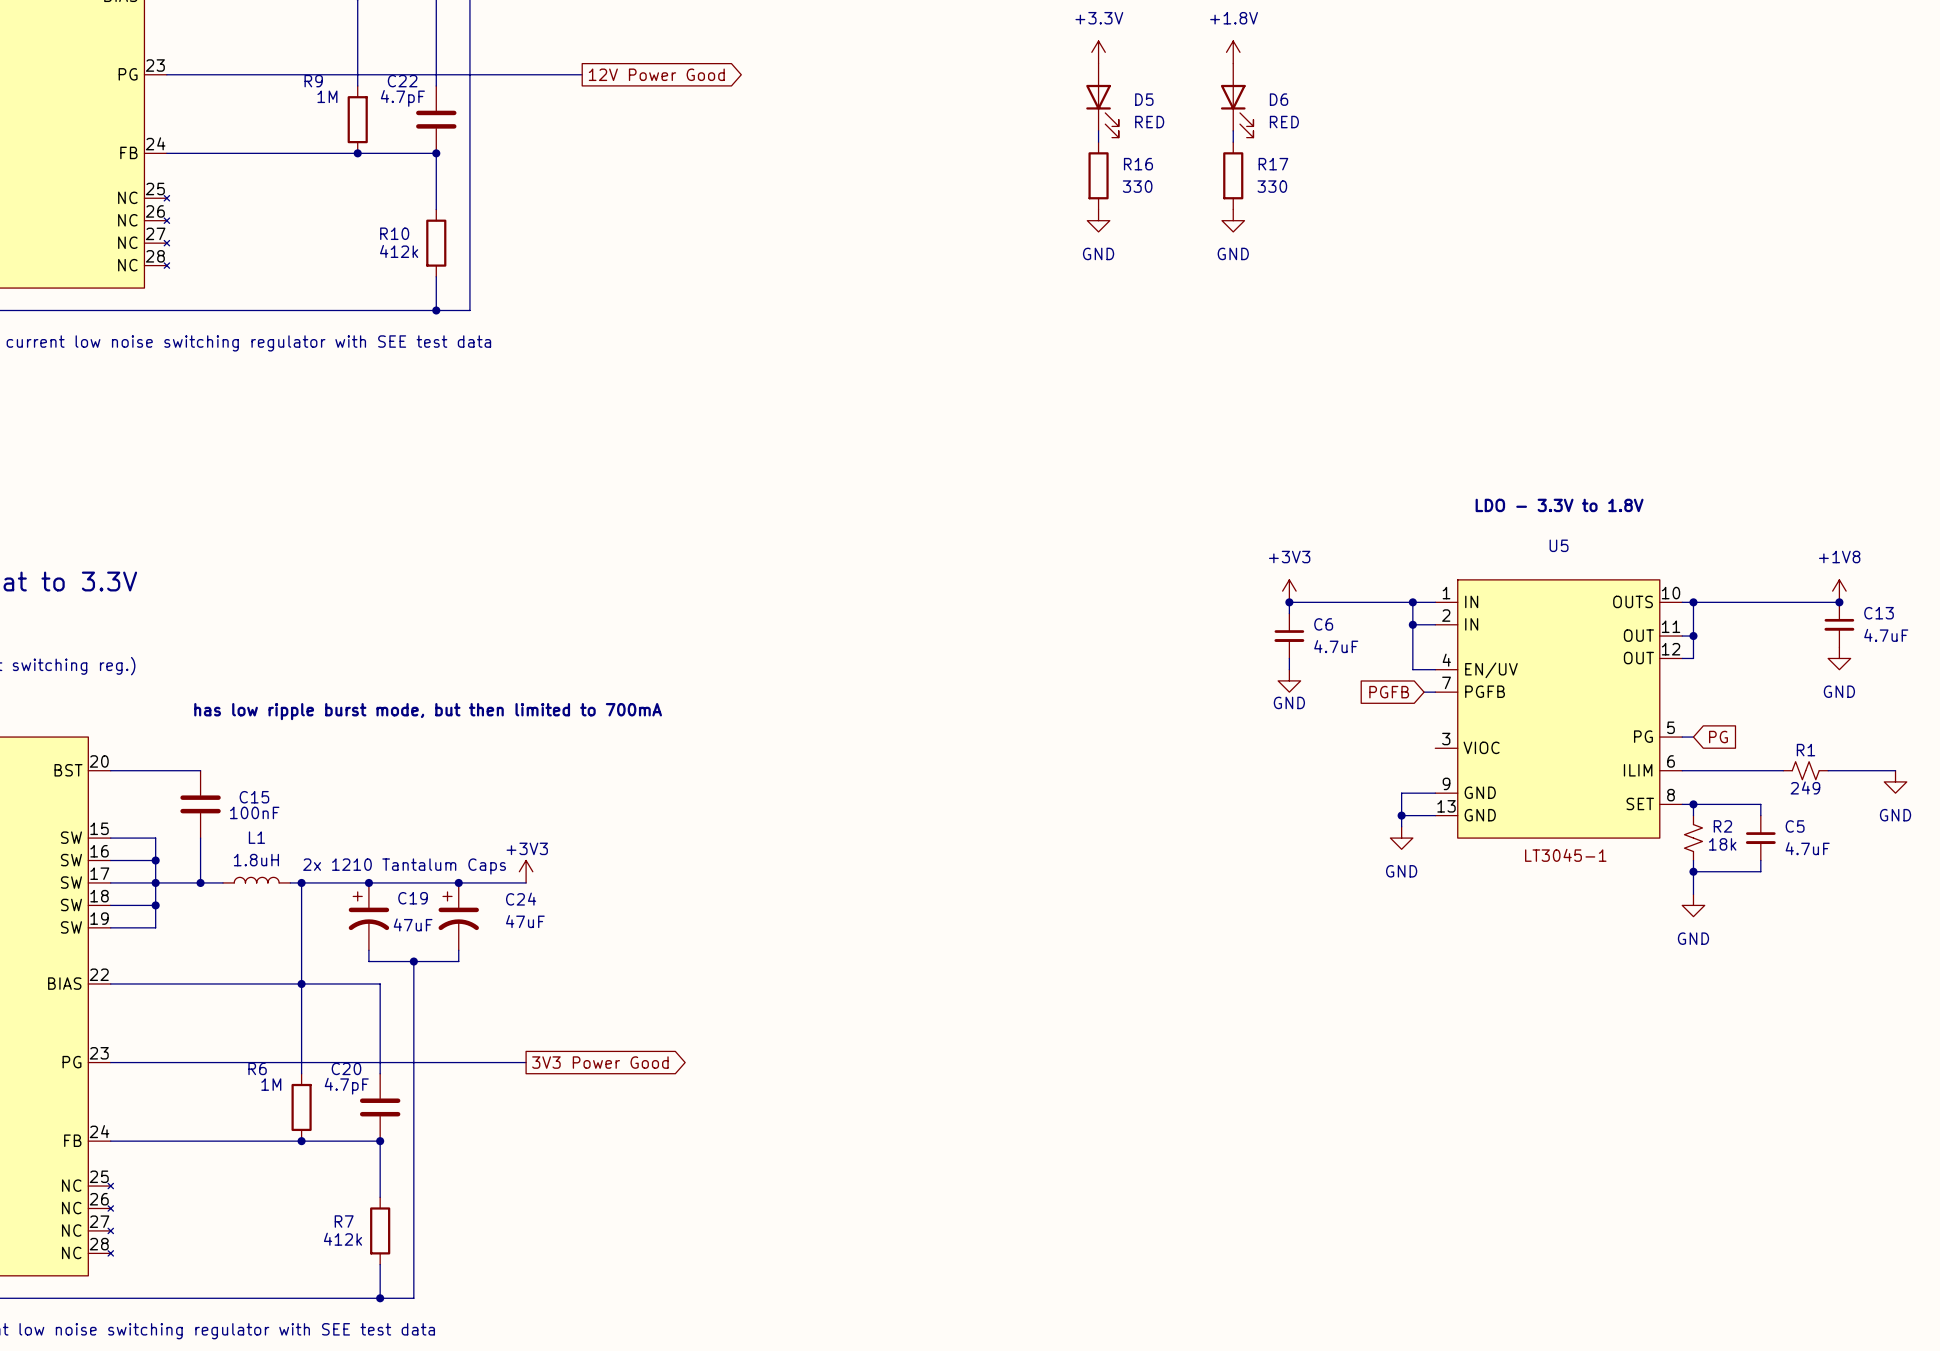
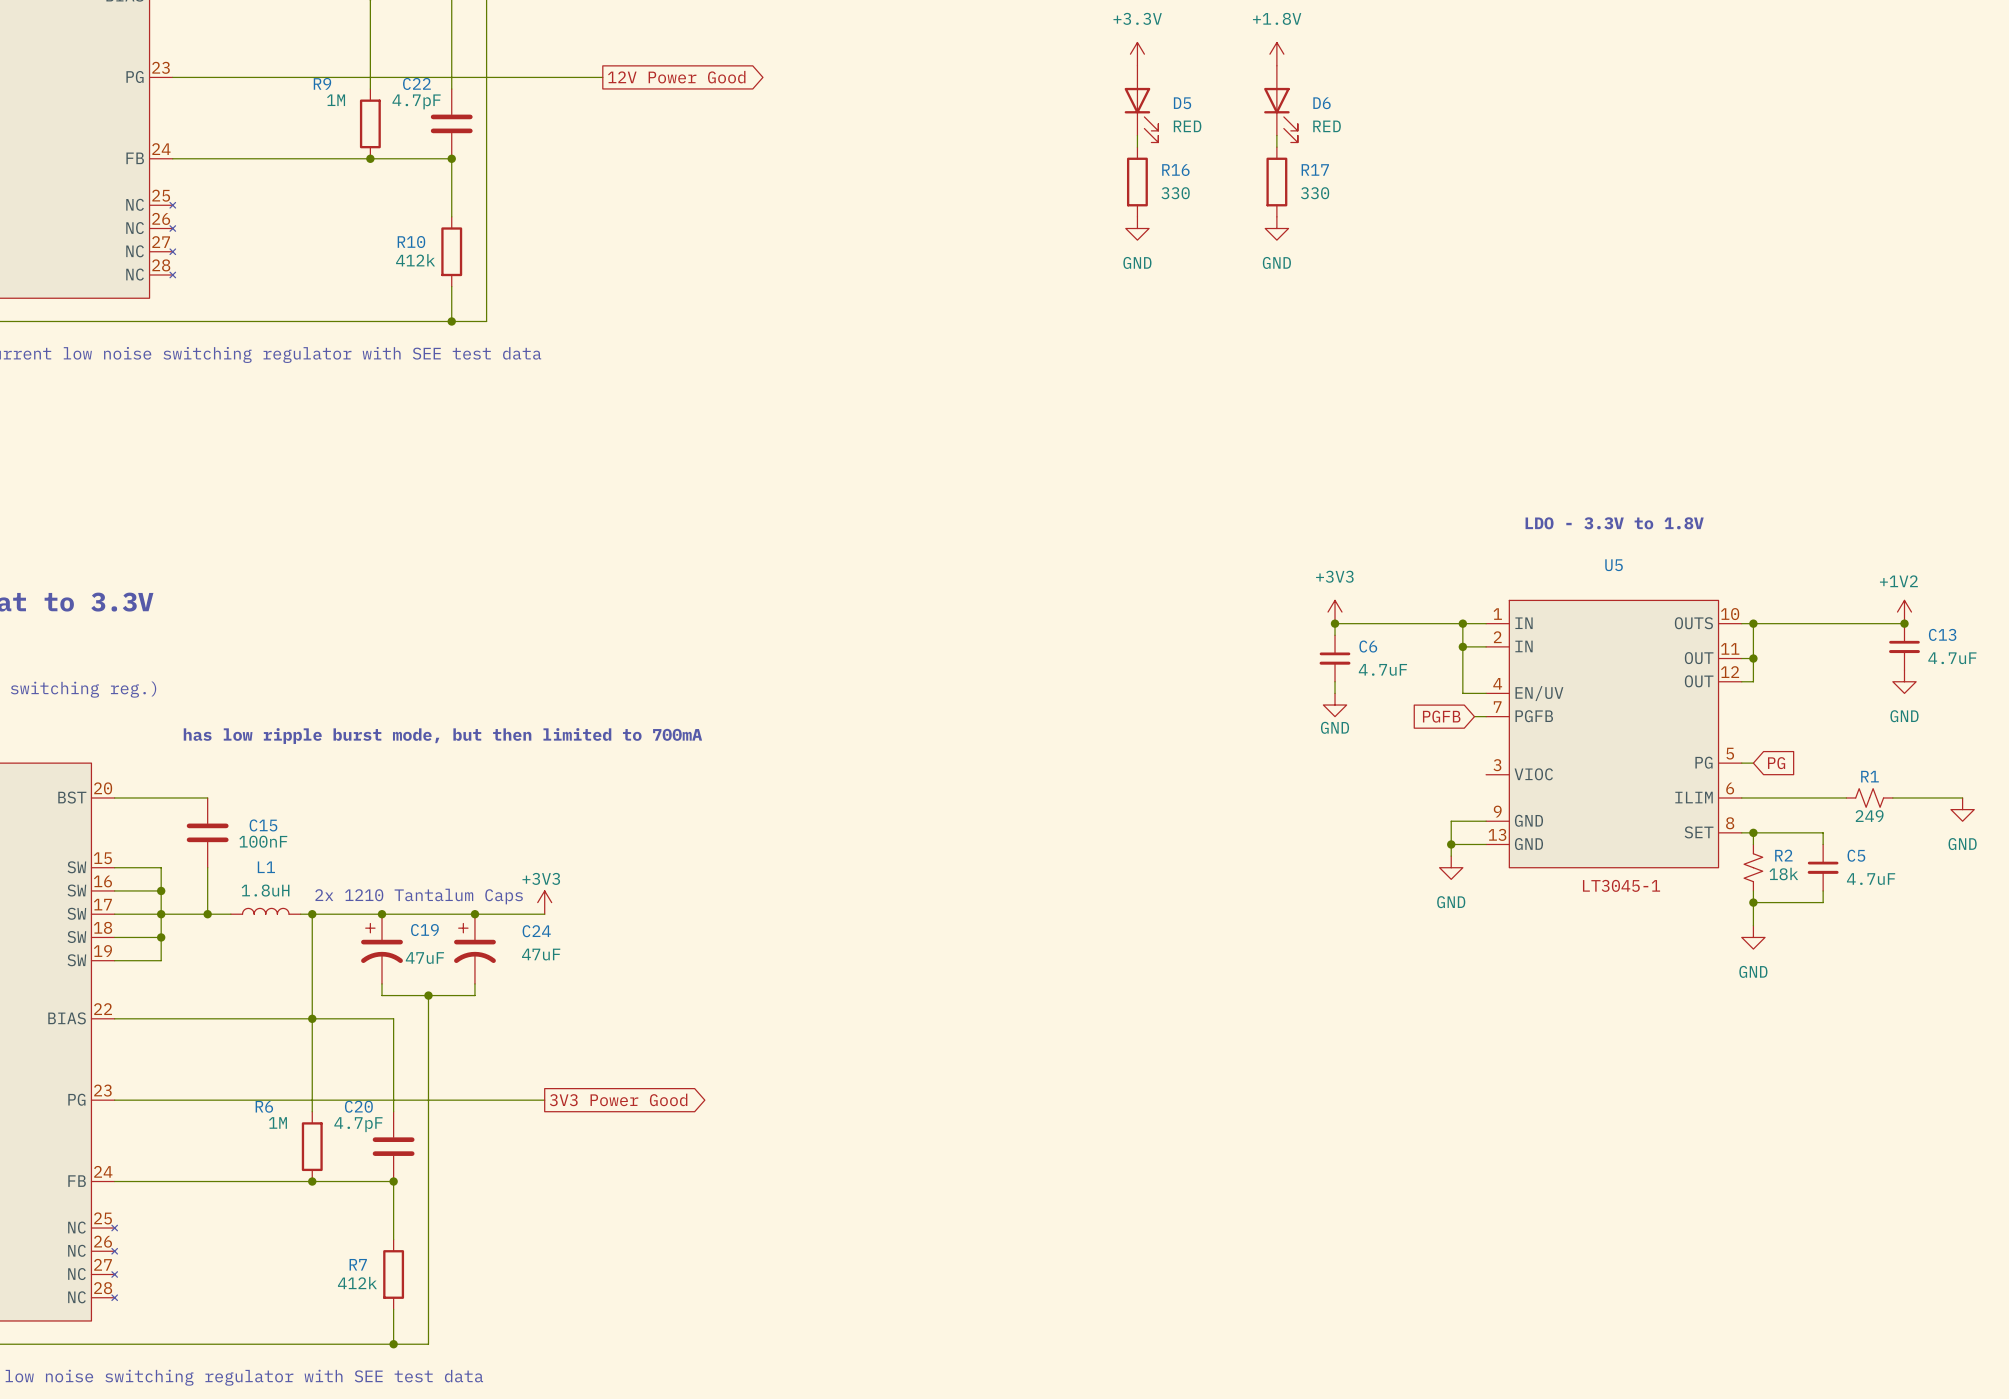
power symbol: +1V8 (1839, 591) -> +1V2 (1904, 612)

